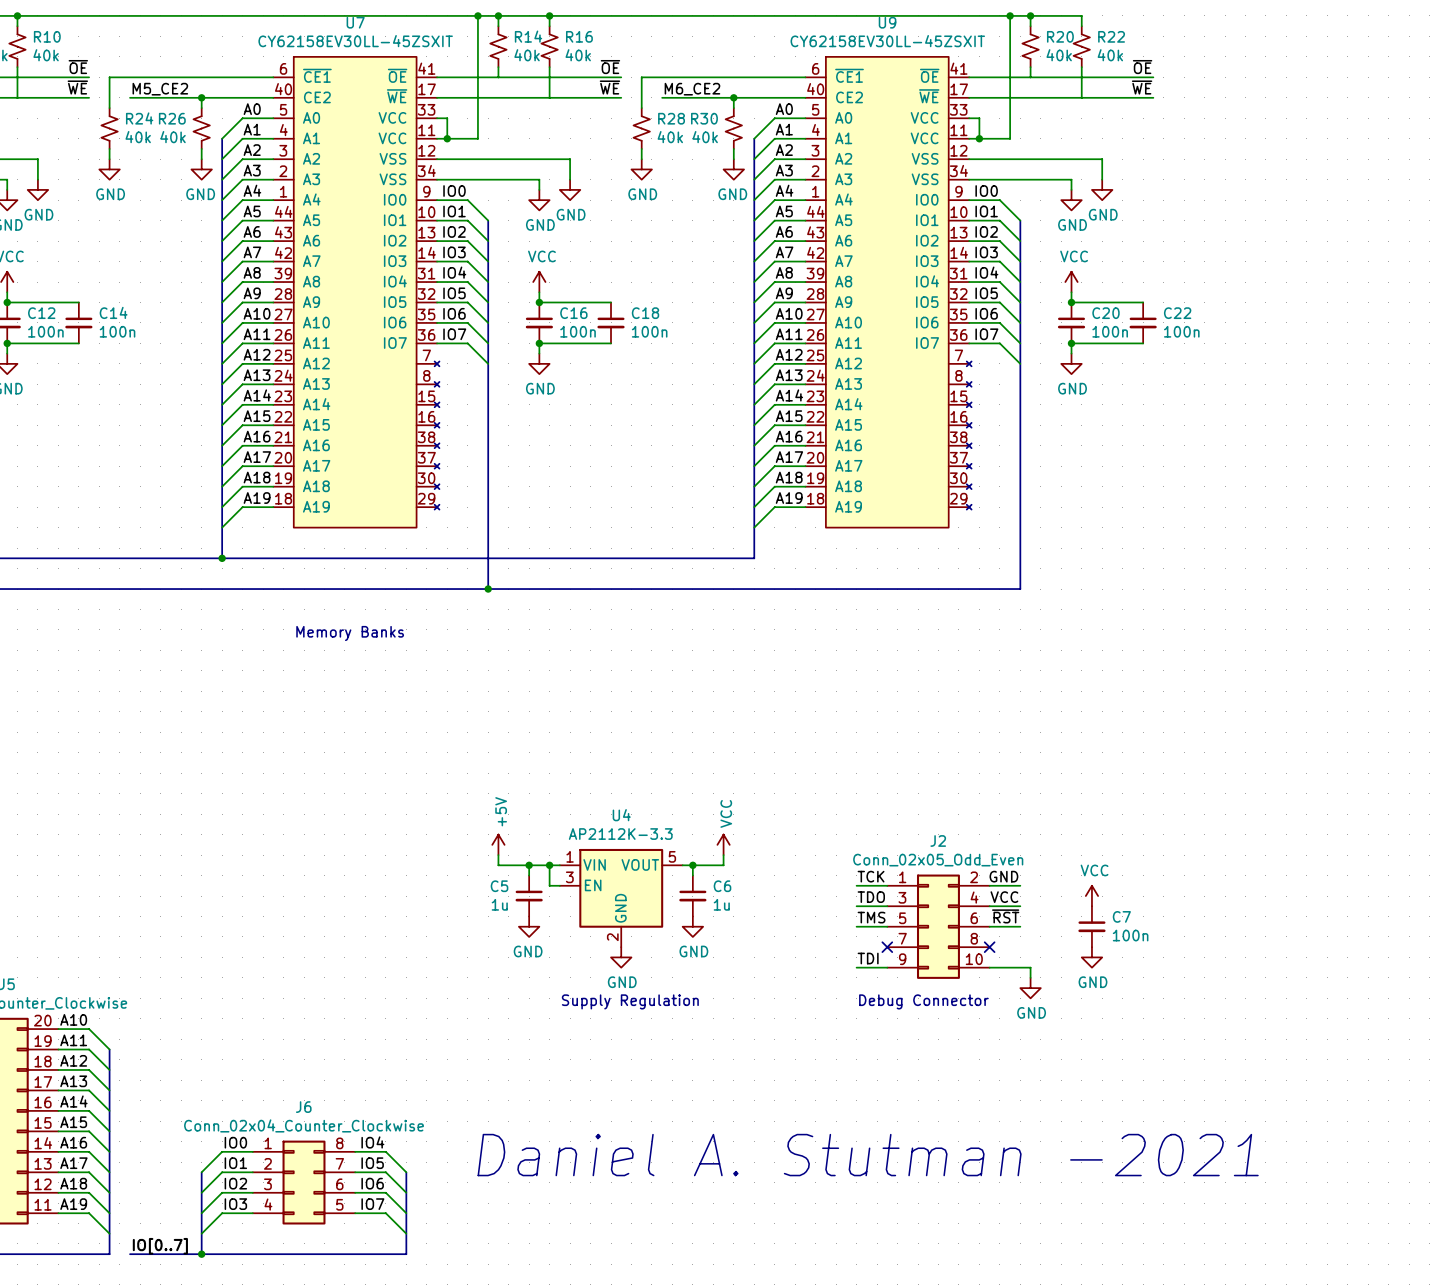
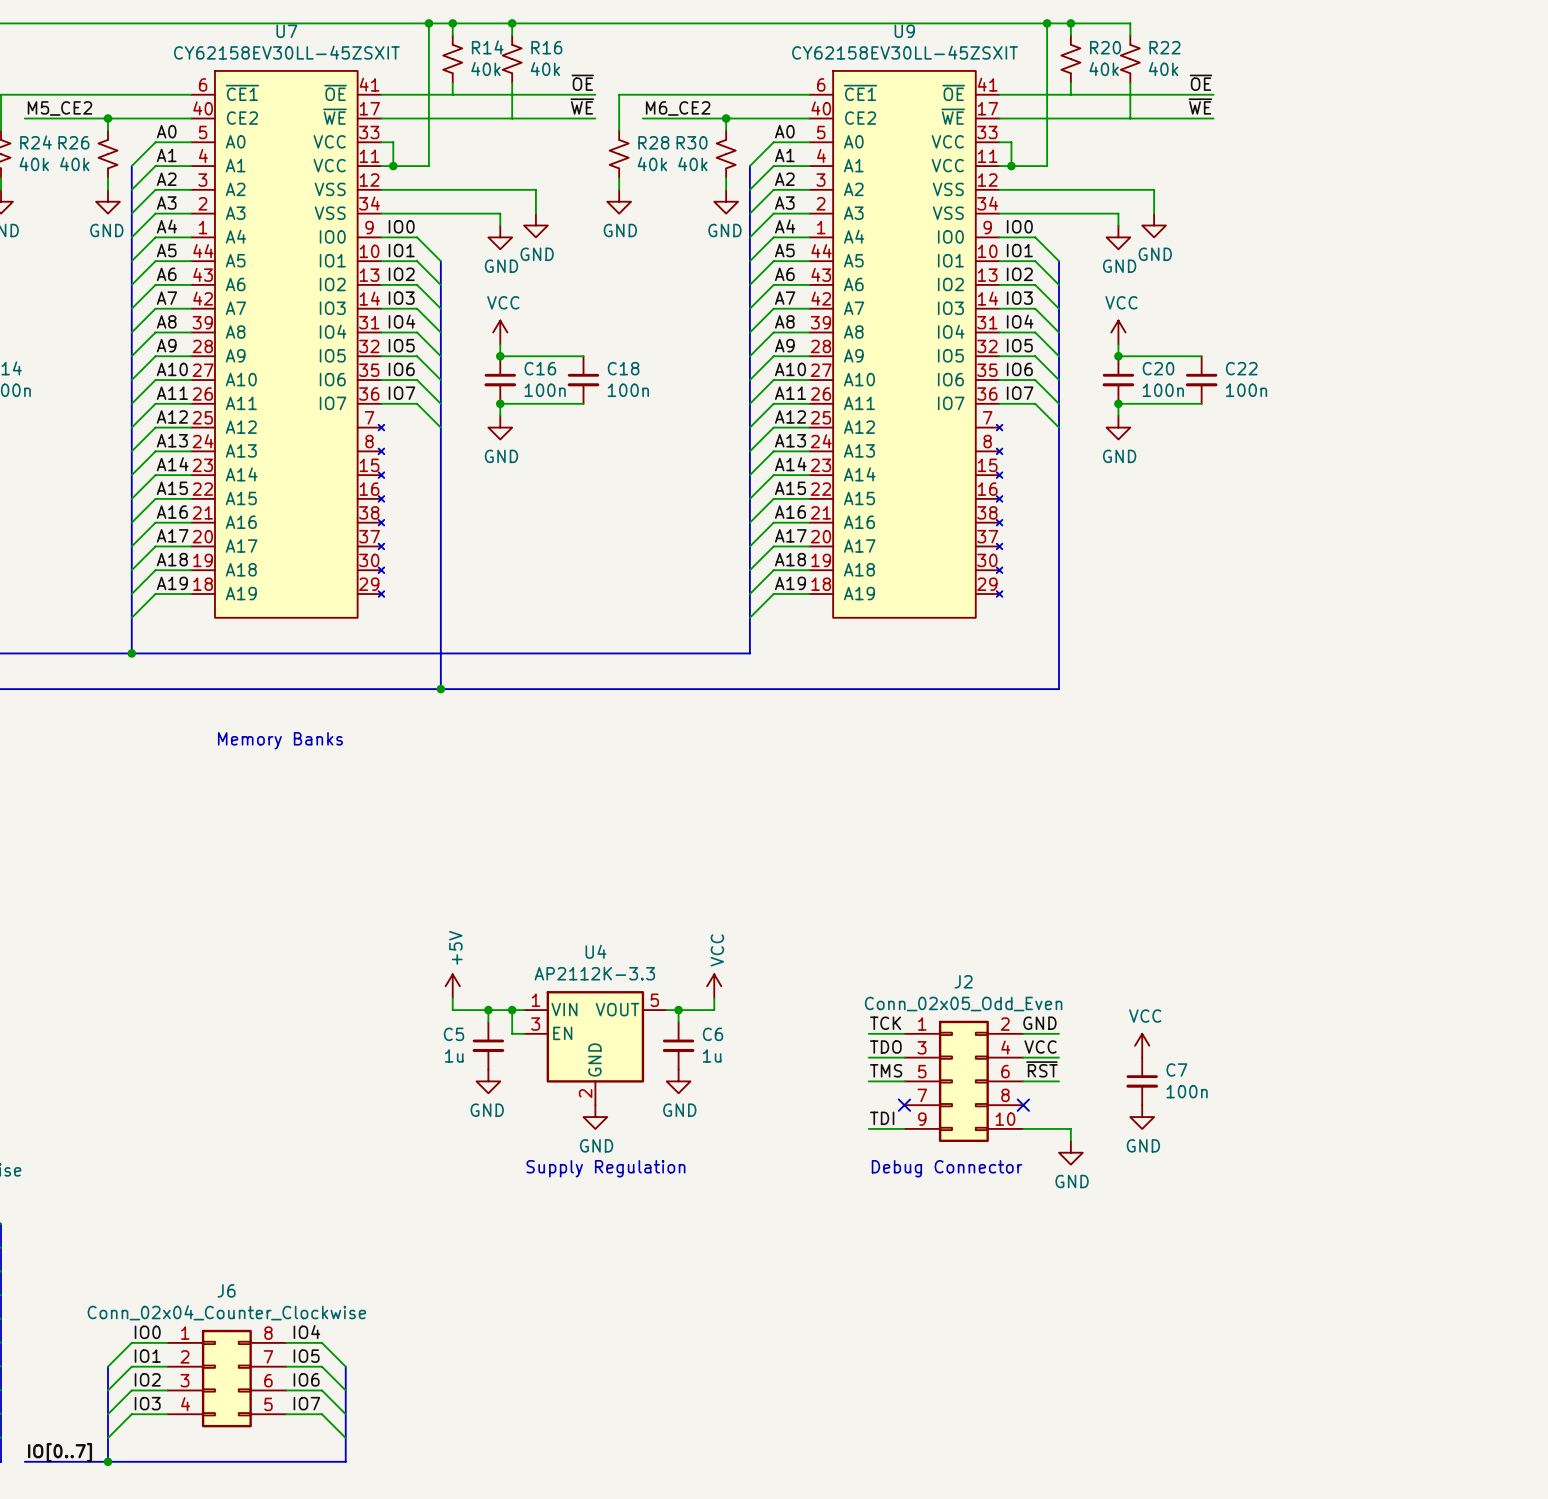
text: Daniel A. Stutman -2021 (868, 1155) -> none

